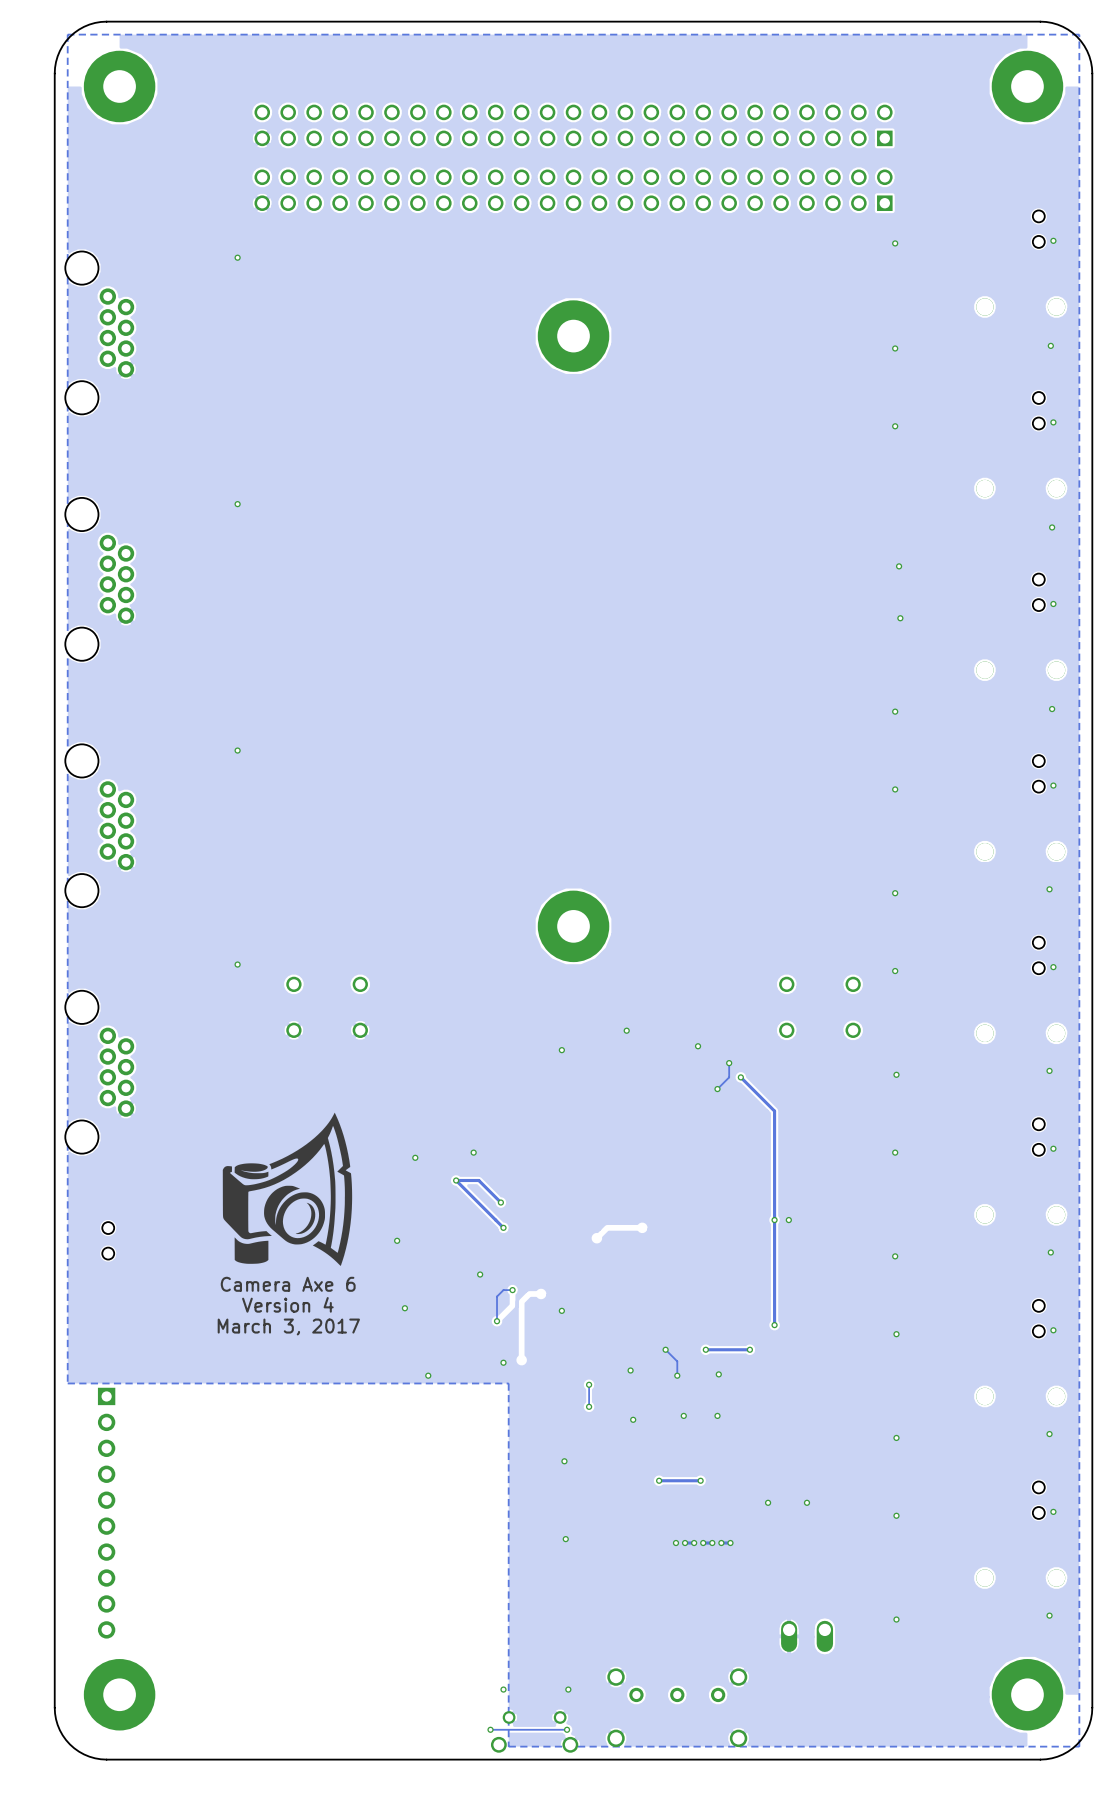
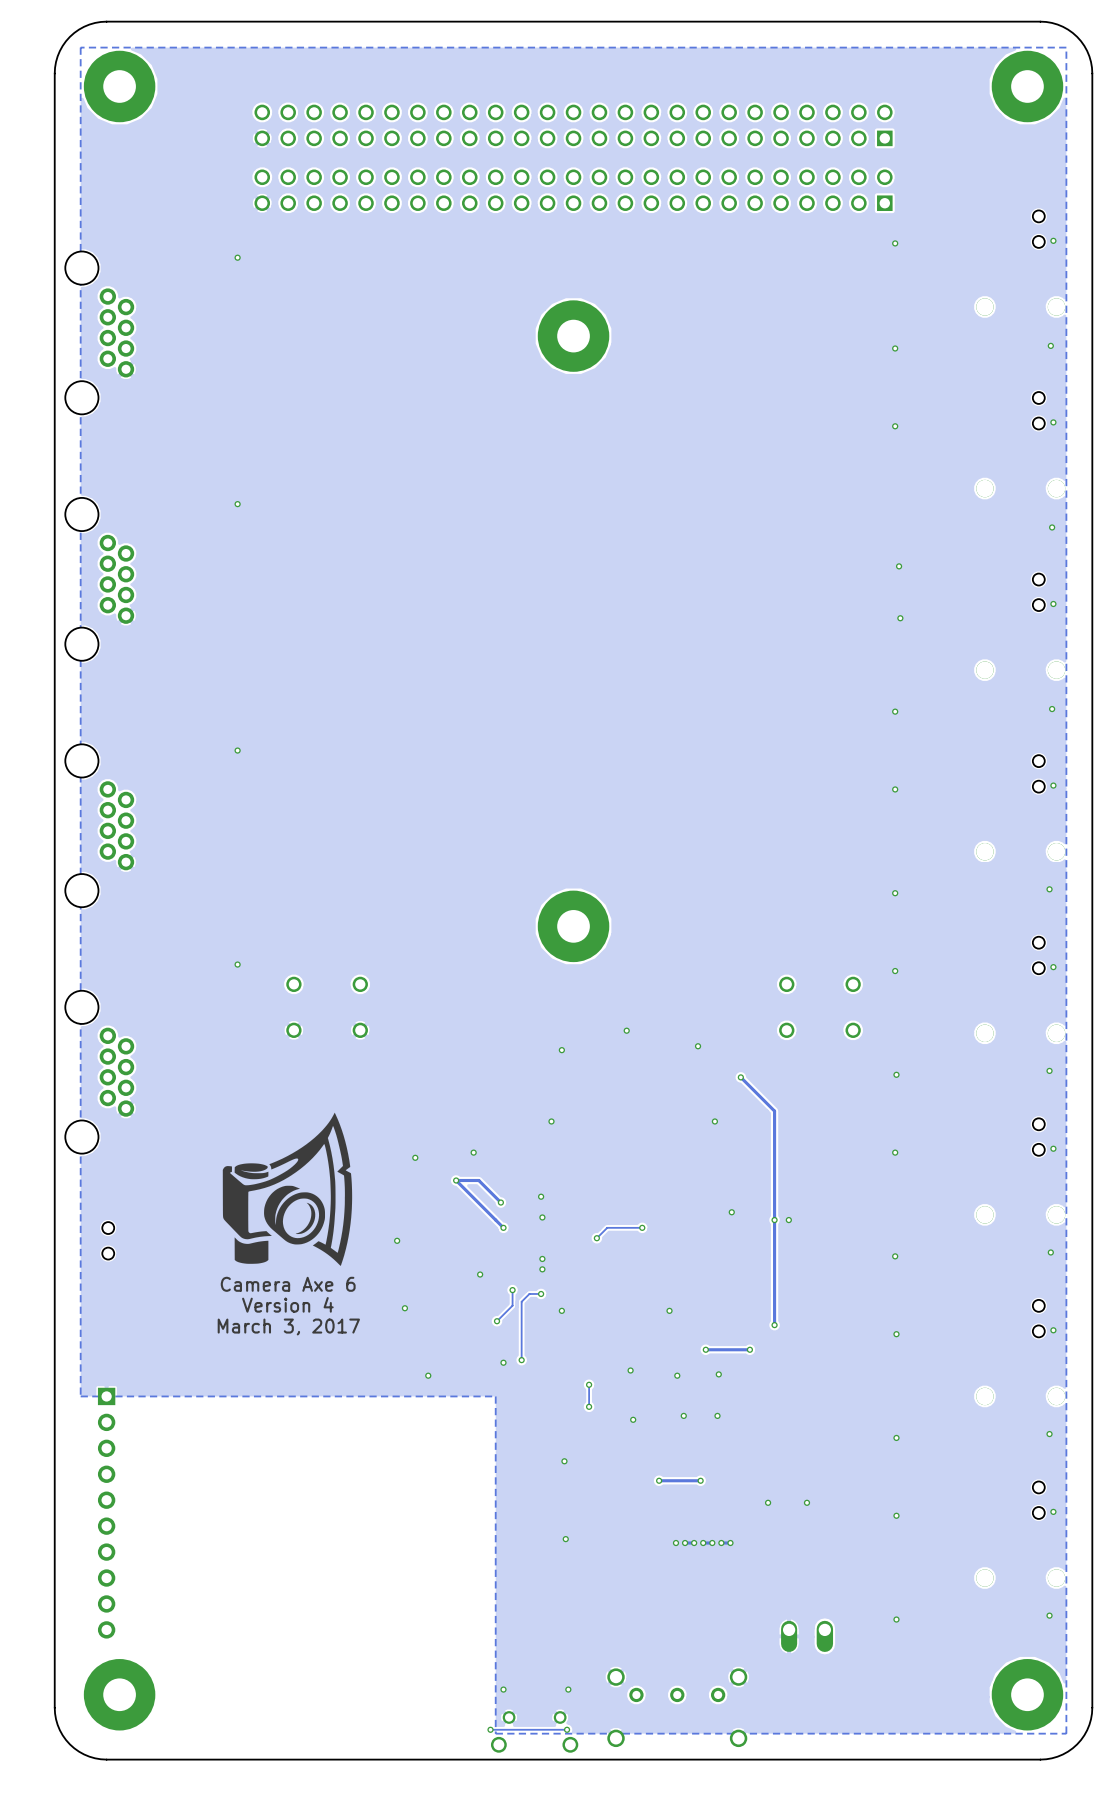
zone outline: (1079, 34) (1079, 1746) (508, 1746) (508, 1383) (67, 1383) (67, 34) (1079, 34) -> (1066, 47) (1066, 1733) (495, 1733) (495, 1396) (80, 1396) (80, 47) (1066, 47)
track: (729, 1063) (729, 1077) (717, 1089) -> none
via: (729, 1063) -> none
via: (717, 1089) -> none
via: none -> (551, 1121)
via: none -> (714, 1121)
via: none -> (541, 1196)
via: none -> (731, 1212)
via: none -> (542, 1217)
track: none -> (642, 1227) (607, 1227) (596, 1238)
via: none -> (642, 1227)
via: none -> (596, 1238)
via: none -> (542, 1258)
via: none -> (542, 1269)
track: (512, 1290) (503, 1290) (497, 1296) (497, 1321) -> (512, 1290) (512, 1305) (497, 1321)
track: none -> (541, 1293) (529, 1293) (521, 1301) (521, 1360)
via: none -> (541, 1293)
track: (665, 1349) (677, 1361) (677, 1375) -> none
via position: (665, 1349) -> (669, 1310)
via: none -> (521, 1360)

